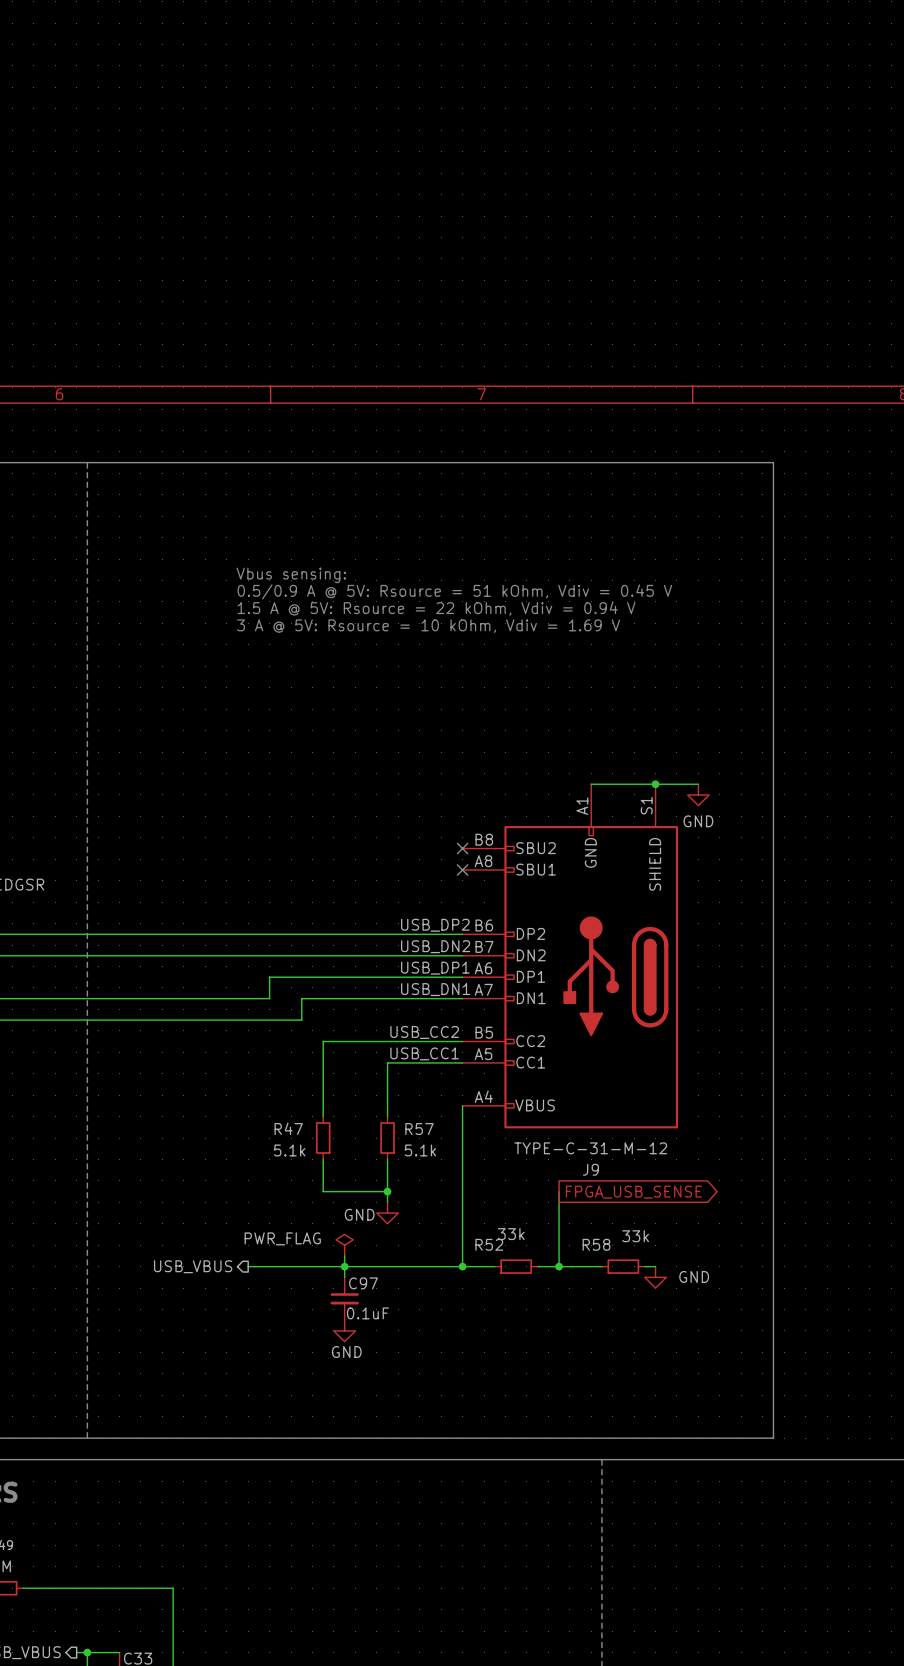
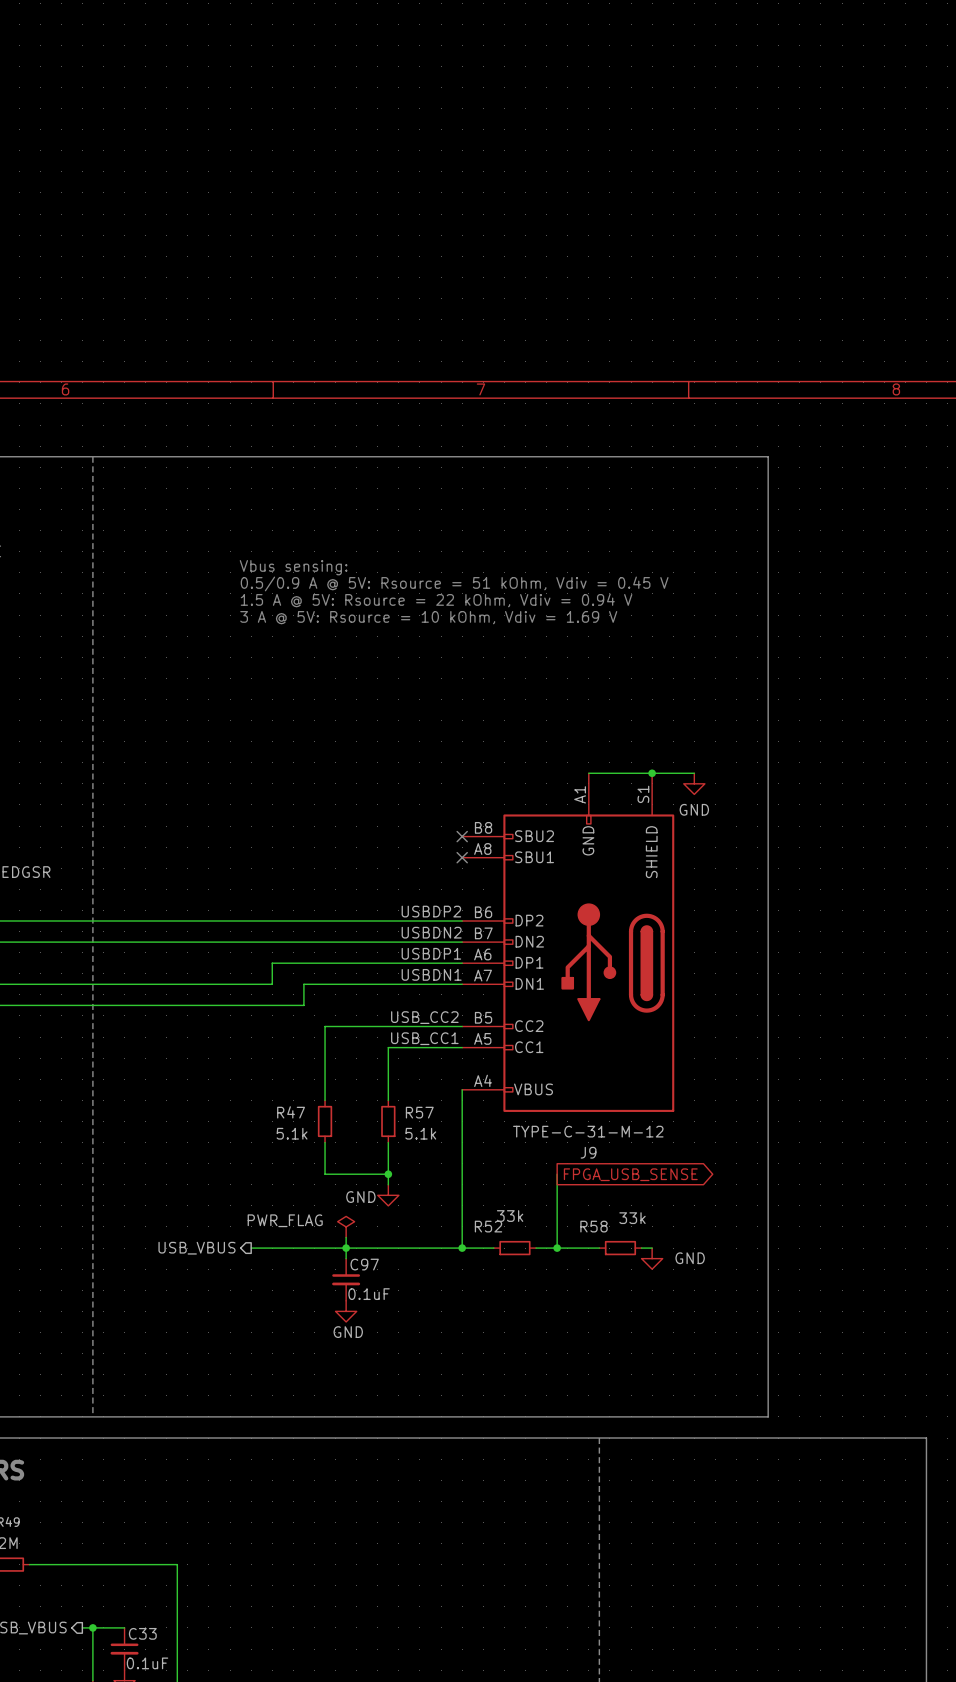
label: USB_DP2 (435, 925) -> USBDP2 (431, 911)
label: USB_DN2 (435, 946) -> USBDN2 (431, 932)
label: USB_DP1 (435, 968) -> USBDP1 (431, 953)
label: USB_DN1 (435, 989) -> USBDN1 (431, 974)

